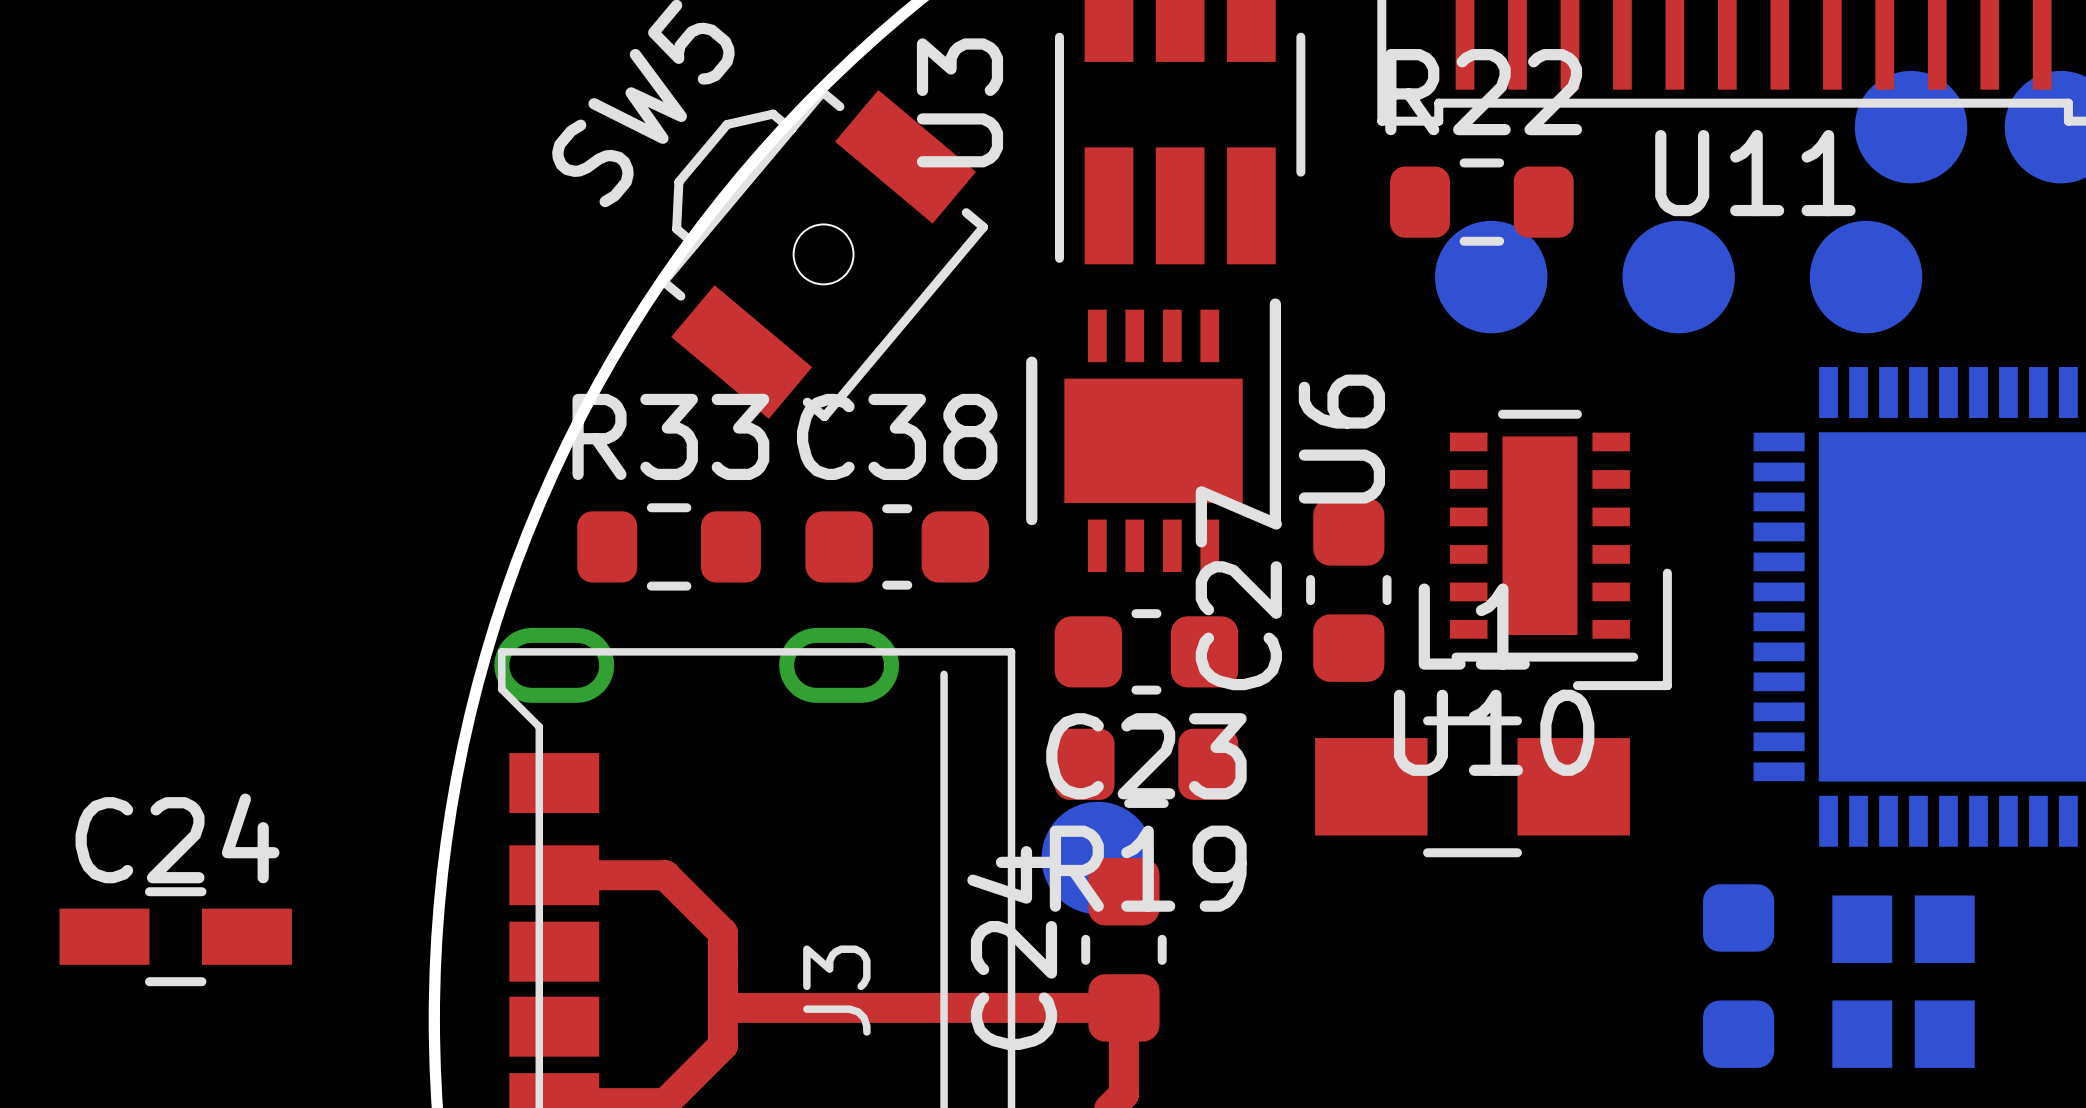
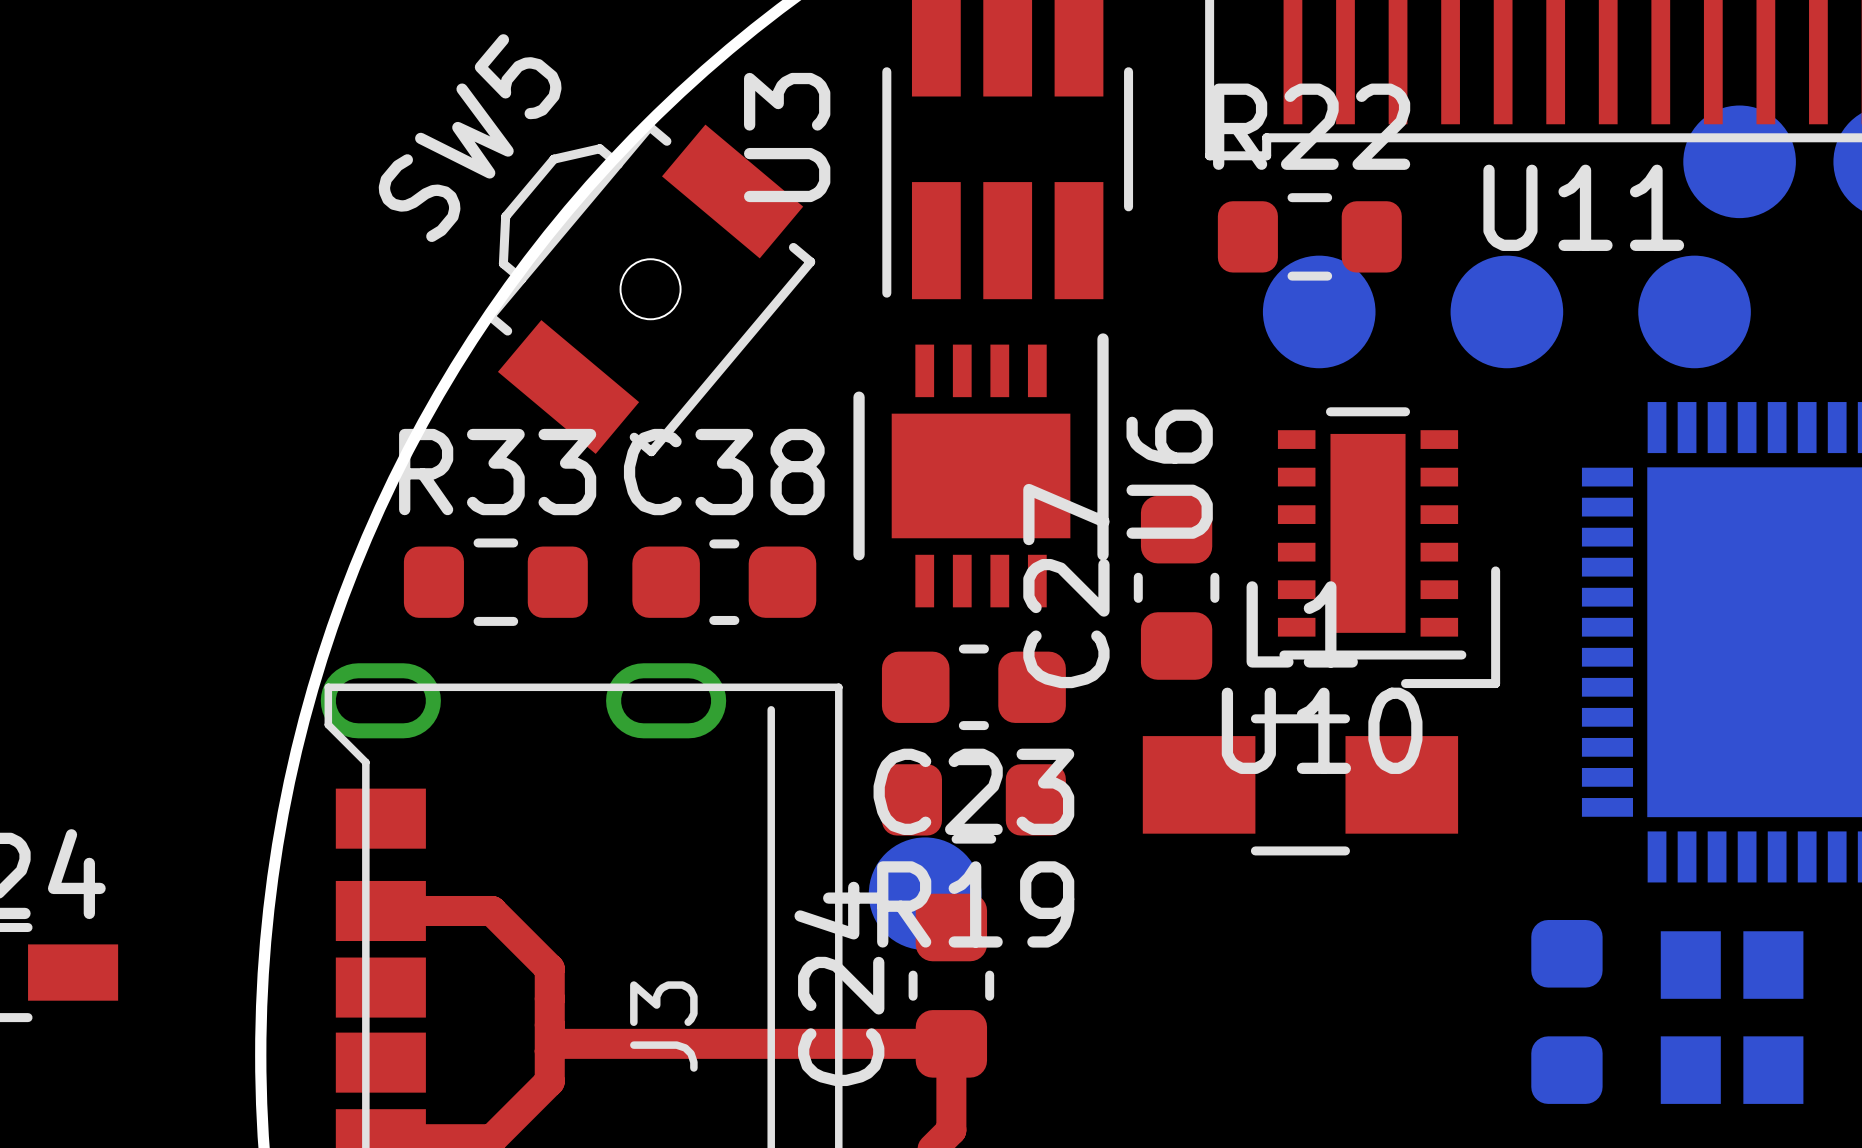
U10 position: (1560, 549) -> (1389, 547)
C27 position: (1348, 590) -> (1176, 587)
L1 position: (1472, 786) -> (1300, 784)

